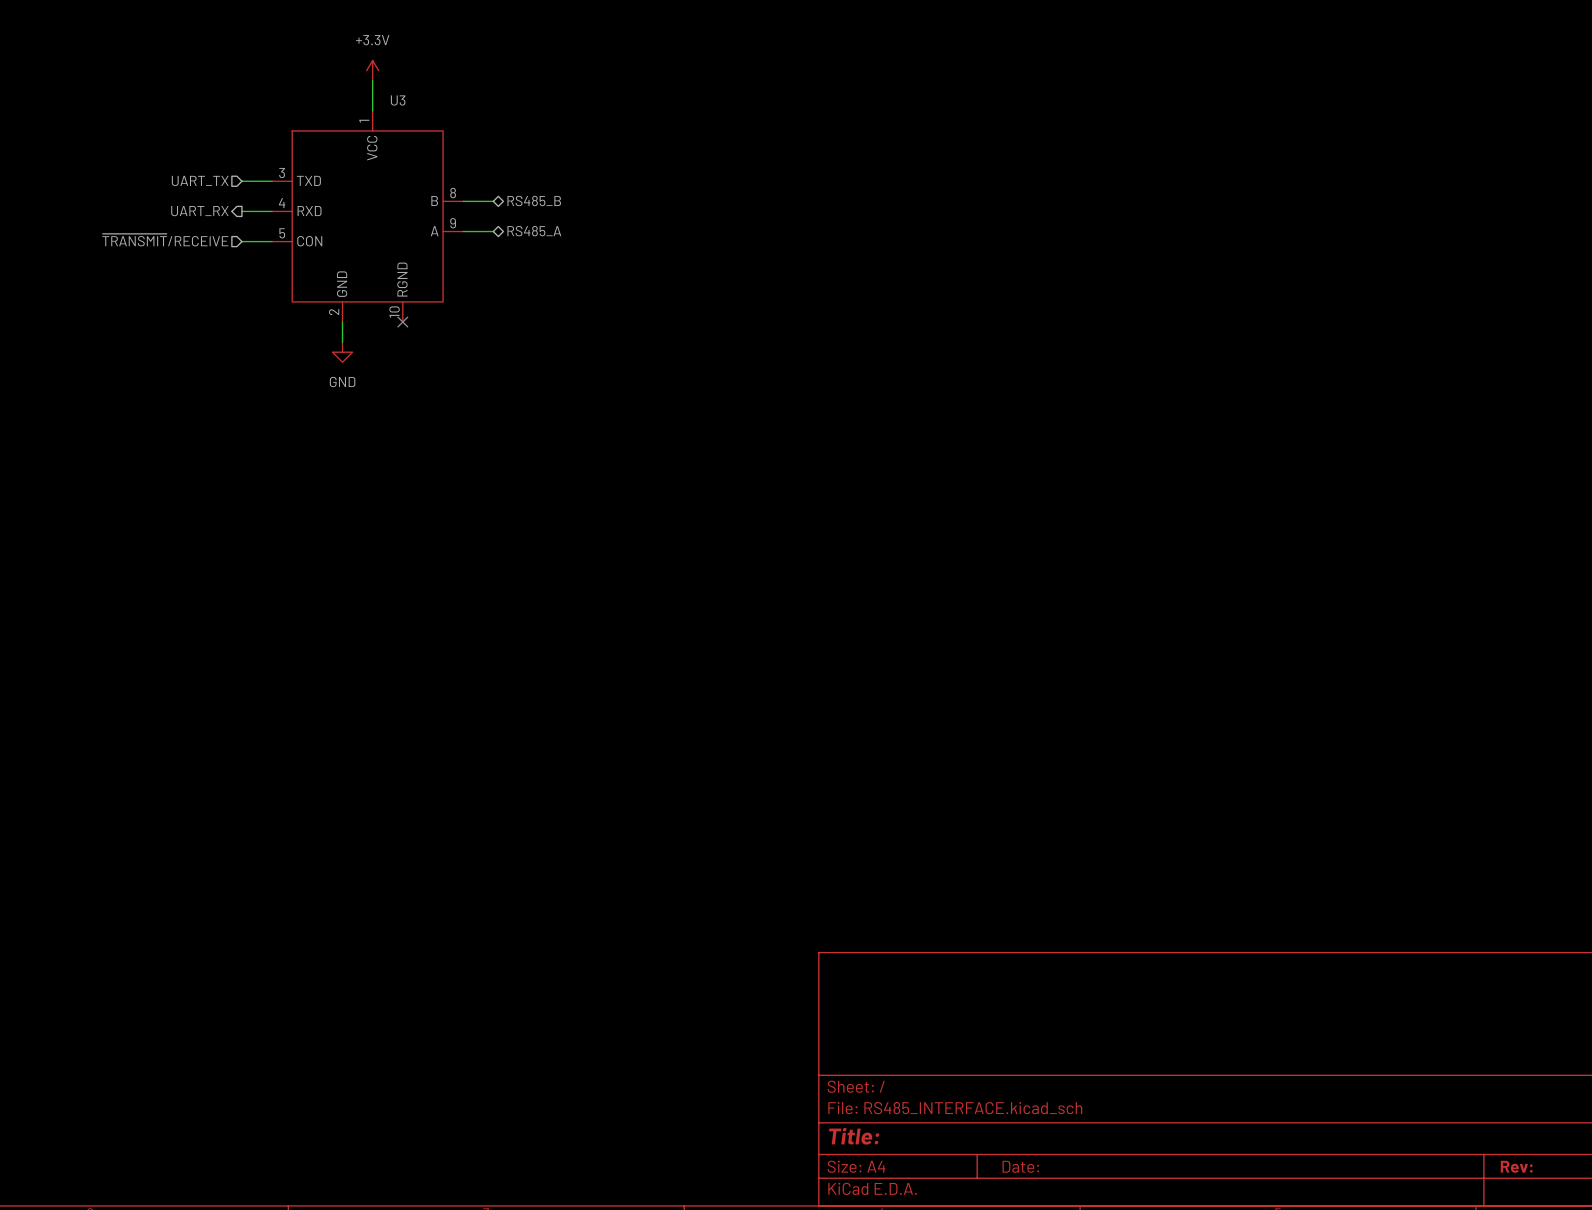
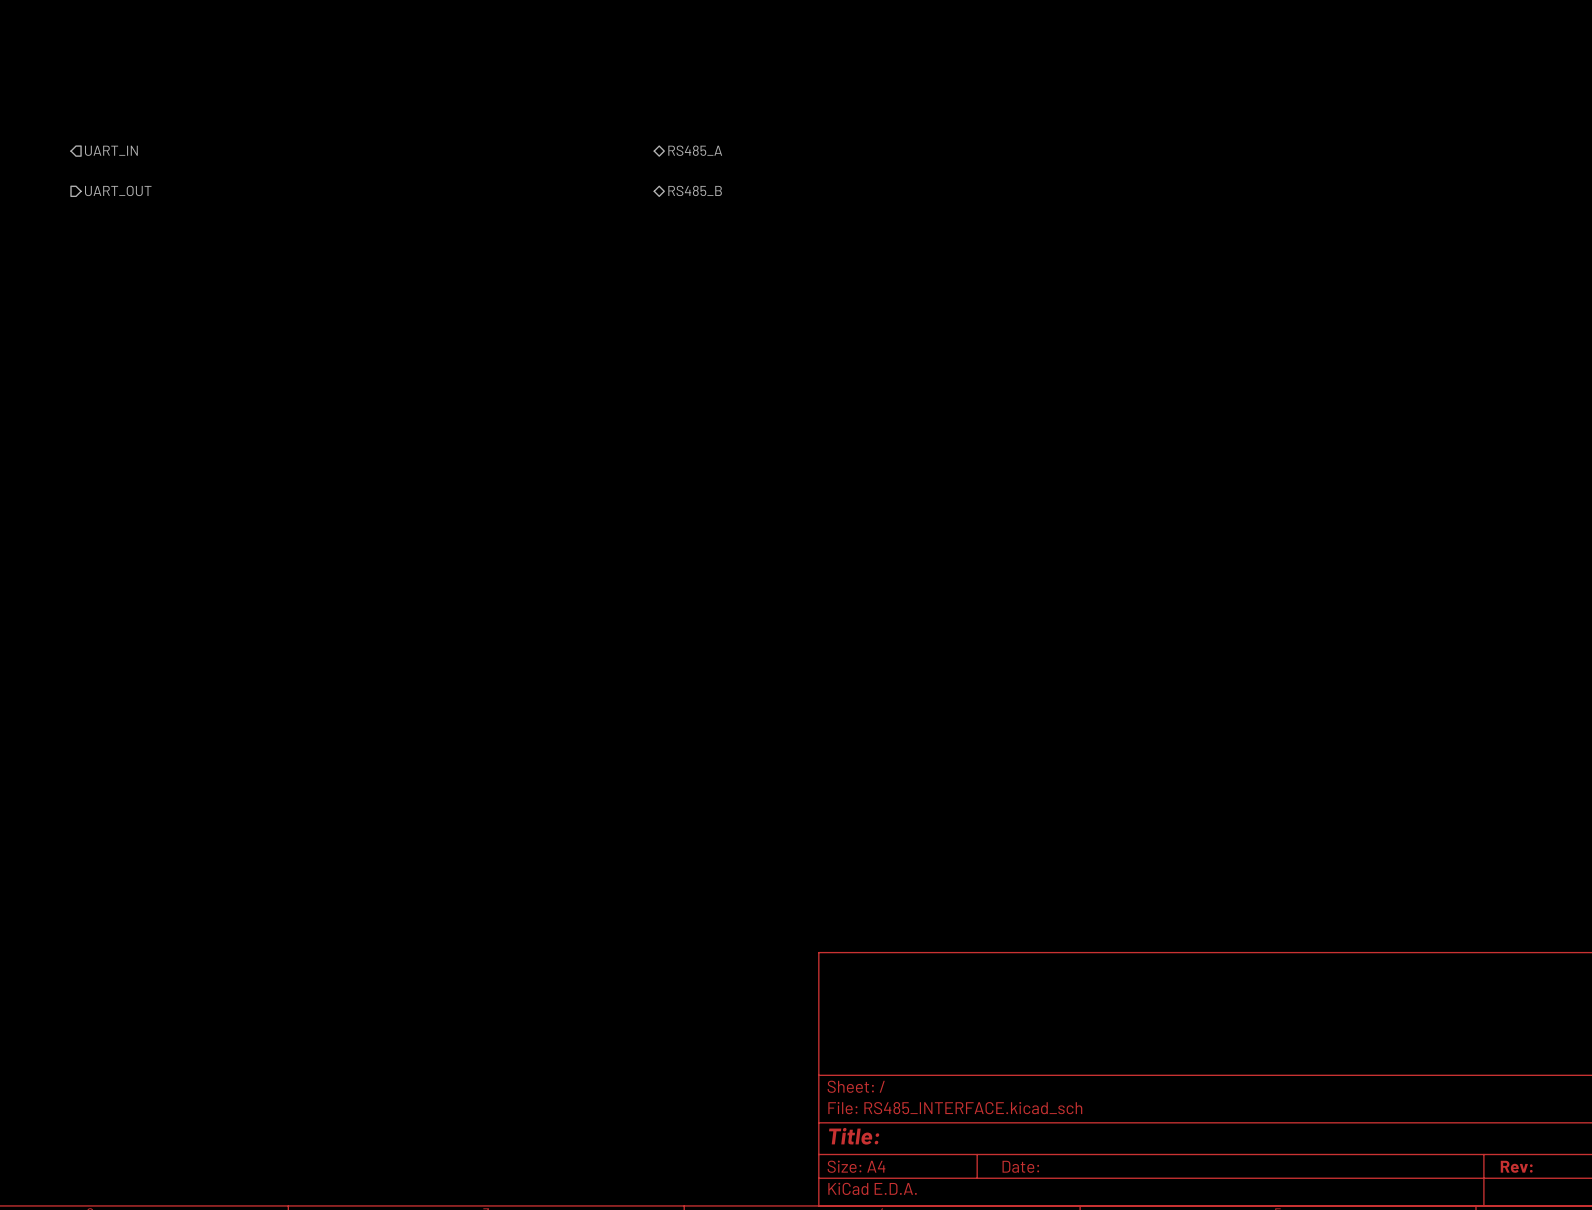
power symbol: +3.3V (372, 70) -> none
wire: (372, 80) (372, 110) -> none
hierarchical label: none -> UART_IN (111, 150)
hierarchical label: UART_TX (200, 180) -> none
wire: (241, 181) (272, 181) -> none
hierarchical label: none -> UART_OUT (118, 190)
hierarchical label position: RS485_B (534, 200) -> RS485_B (695, 190)
wire: (463, 201) (493, 201) -> none
hierarchical label: UART_RX (199, 211) -> none
wire: (241, 211) (272, 211) -> none
U3: (367, 216) -> none
wire: (463, 231) (493, 231) -> none
hierarchical label position: RS485_A (534, 231) -> RS485_A (695, 150)
hierarchical label: ~{TRANSMIT}/RECEIVE (165, 240) -> none
wire: (241, 241) (272, 241) -> none
wire: (342, 322) (342, 342) -> none
no-connect mark: (402, 322) -> none
power symbol: GND (342, 352) -> none

